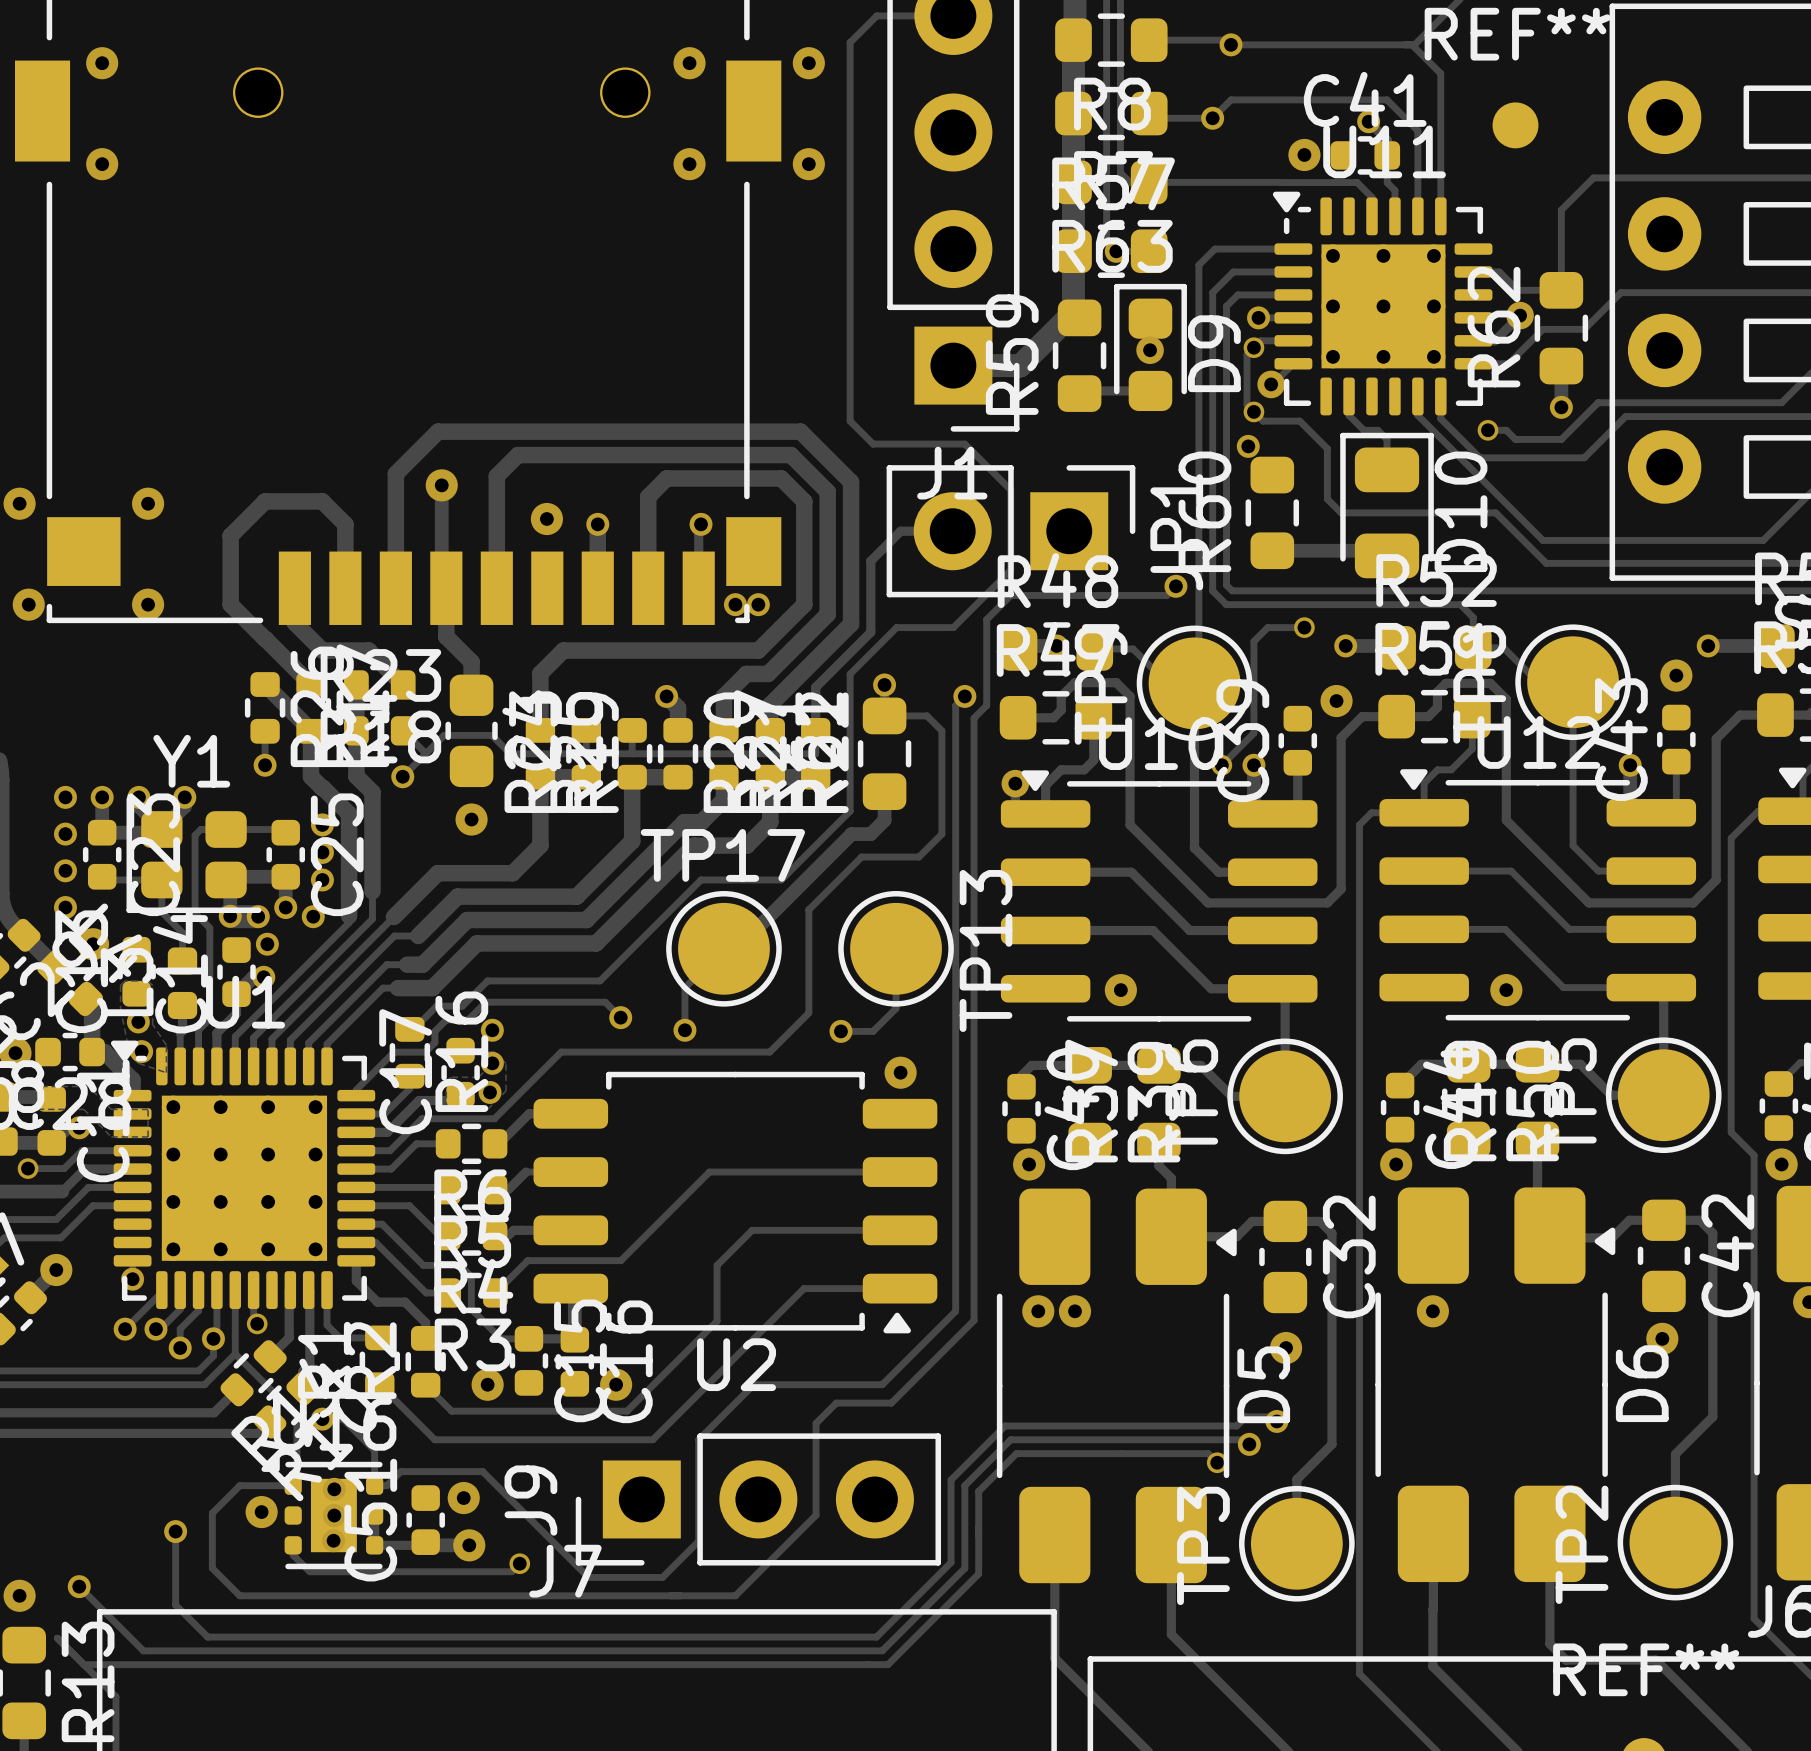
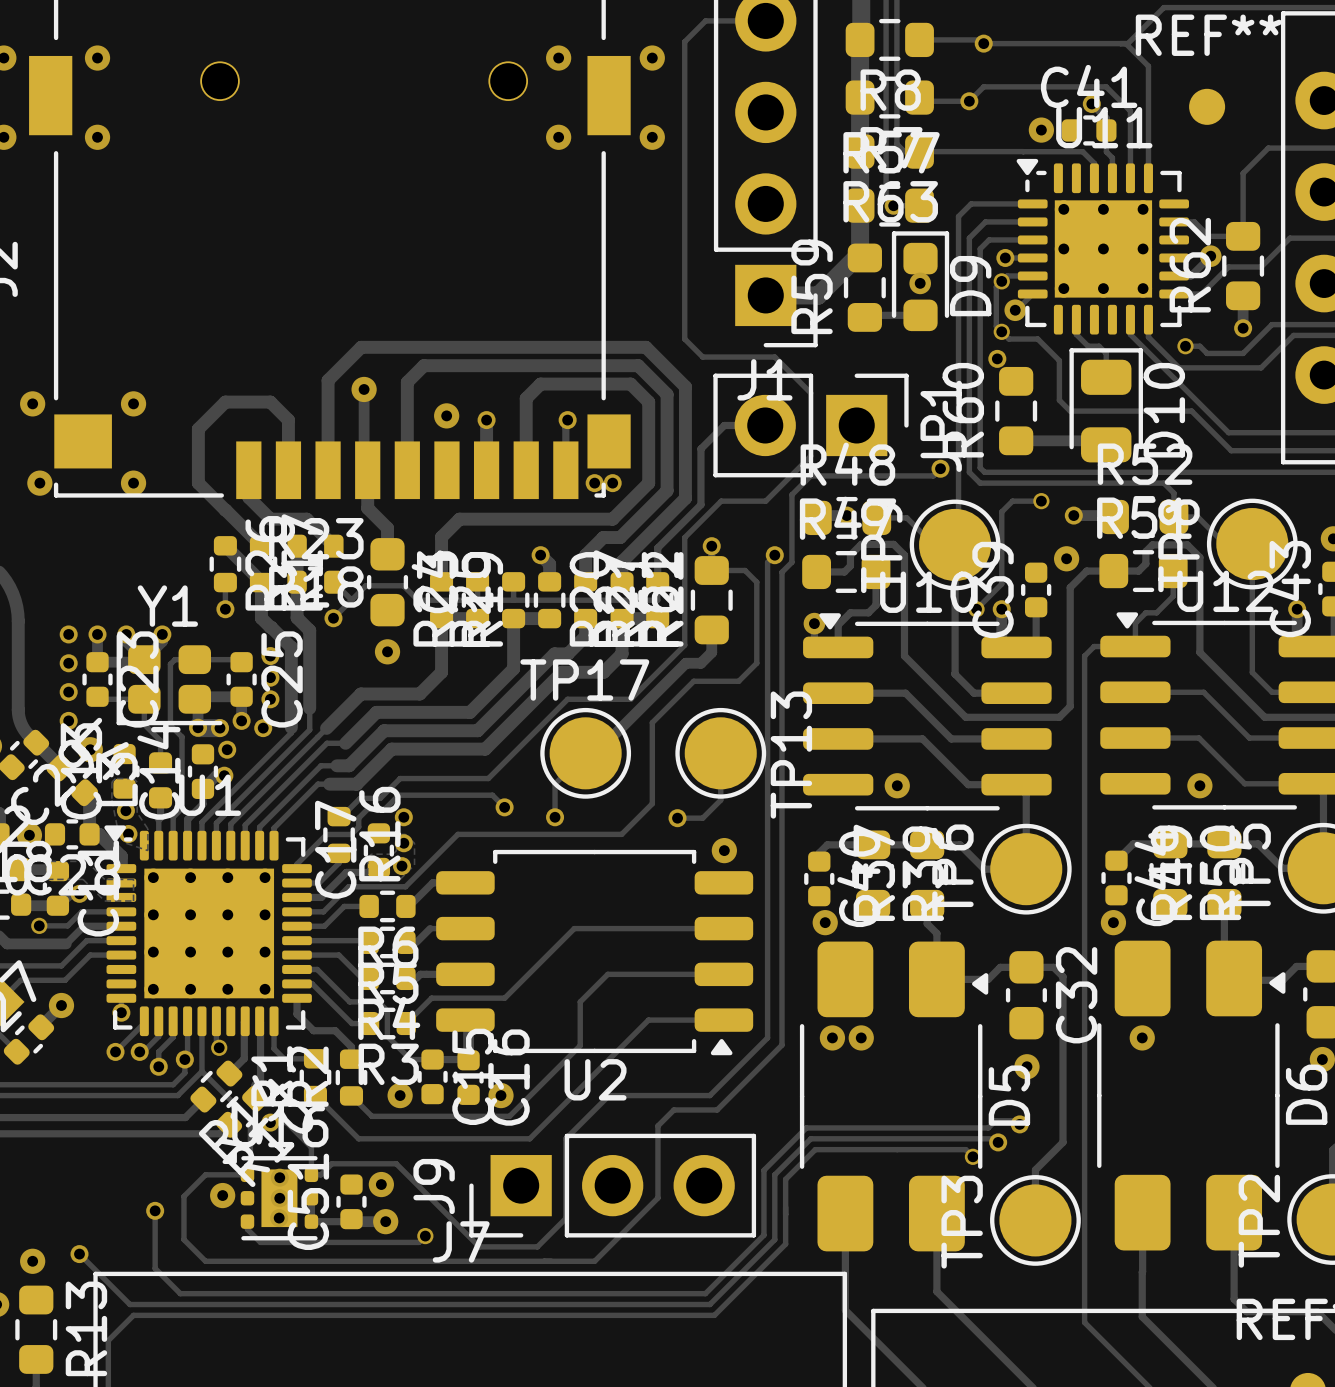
track: (57, 1638) (115, 1696) -> none
track: (83, 1664) (148, 1664) -> (108, 1340) (133, 1315)

